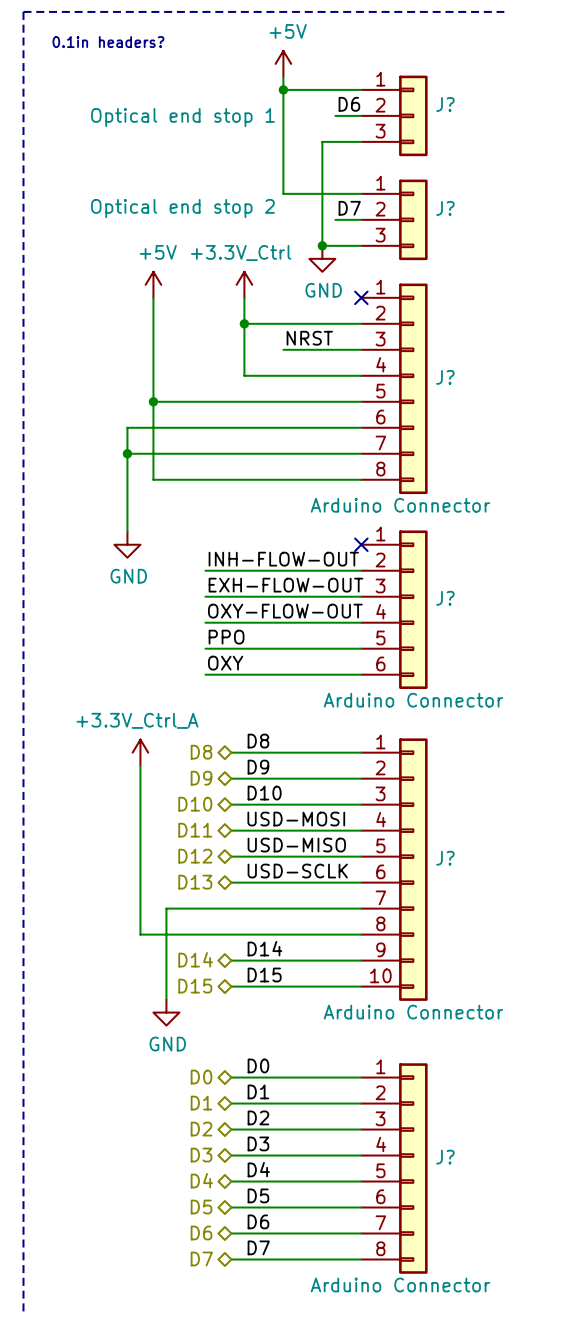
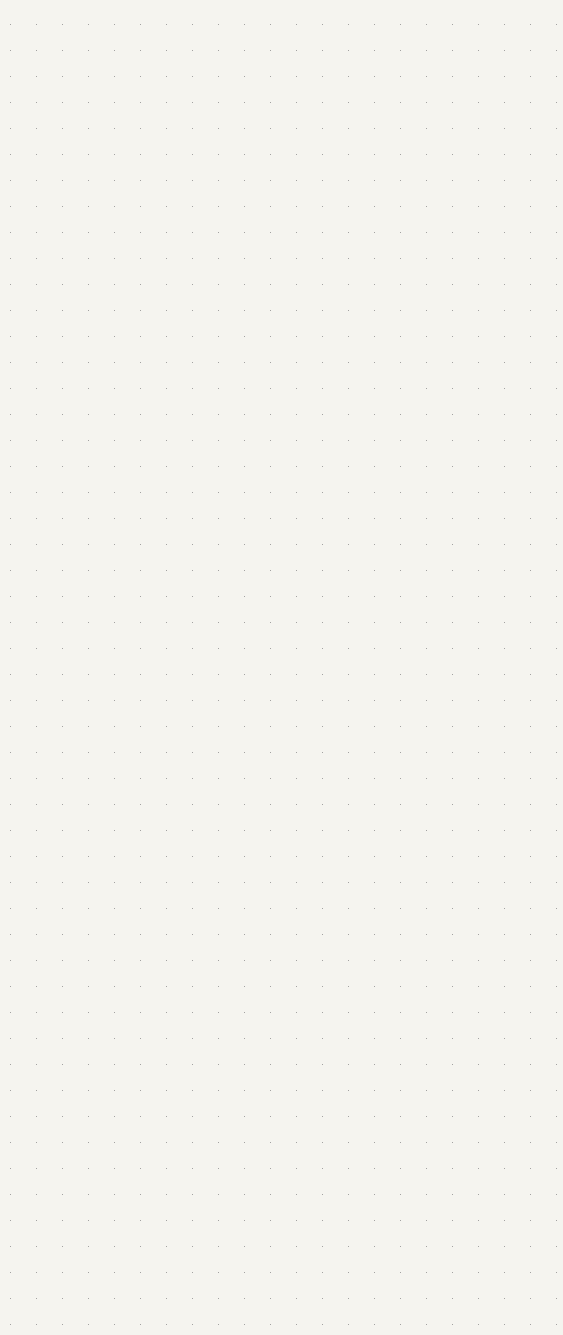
line: (504, 11) (23, 11) (23, 1311) -> none
text: 0.1in headers? (108, 42) -> none
power symbol: +5V (283, 63) -> none
wire: (283, 76) (283, 193) (361, 193) -> none
wire: (283, 89) (361, 89) -> none
junction: (283, 89) -> none
label: D6 (349, 104) -> none
wire: (335, 115) (361, 115) -> none
J?: Optical end stop 1 (394, 115) -> none
wire: (361, 141) (322, 141) (322, 245) (361, 245) -> none
label: D7 (349, 208) -> none
wire: (335, 219) (361, 219) -> none
J?: Optical end stop 2 (394, 219) -> none
junction: (322, 245) -> none
power symbol: GND (322, 258) -> none
power symbol: +5V (153, 284) -> none
power symbol: +3.3V_Ctrl (244, 284) -> none
wire: (153, 297) (153, 479) (361, 479) -> none
wire: (244, 297) (244, 375) (361, 375) -> none
no-connect mark: (361, 297) -> none
wire: (244, 323) (361, 323) -> none
junction: (244, 323) -> none
label: NRST (309, 338) -> none
wire: (283, 349) (361, 349) -> none
J?: Arduino Connector (394, 388) -> none
wire: (153, 401) (361, 401) -> none
junction: (153, 401) -> none
wire: (361, 427) (127, 427) (127, 531) -> none
wire: (127, 453) (361, 453) -> none
junction: (127, 453) -> none
power symbol: GND (127, 544) -> none
no-connect mark: (361, 544) -> none
label: INH-FLOW-OUT (283, 559) -> none
wire: (205, 570) (361, 570) -> none
label: EXH-FLOW-OUT (285, 585) -> none
wire: (205, 596) (361, 596) -> none
J?: Arduino Connector (394, 609) -> none
label: OXY-FLOW-OUT (285, 611) -> none
wire: (205, 622) (361, 622) -> none
label: PPO (226, 637) -> none
wire: (205, 648) (361, 648) -> none
label: OXY (225, 663) -> none
wire: (205, 674) (361, 674) -> none
label: D8 (258, 741) -> none
power symbol: +3.3V_Ctrl_A (140, 752) -> none
hierarchical label: D8 (201, 752) -> none
wire: (231, 752) (361, 752) -> none
wire: (140, 765) (140, 934) (361, 934) -> none
label: D9 (258, 767) -> none
hierarchical label: D9 (201, 778) -> none
wire: (231, 778) (361, 778) -> none
label: D10 (264, 793) -> none
hierarchical label: D10 (195, 804) -> none
wire: (231, 804) (361, 804) -> none
label: USD-MOSI (296, 819) -> none
hierarchical label: D11 (195, 830) -> none
wire: (231, 830) (361, 830) -> none
label: USD-MISO (296, 845) -> none
hierarchical label: D12 (195, 856) -> none
wire: (231, 856) (361, 856) -> none
J?: Arduino Connector (394, 869) -> none
label: USD-SCLK (297, 871) -> none
hierarchical label: D13 (195, 882) -> none
wire: (231, 882) (361, 882) -> none
wire: (361, 908) (166, 908) (166, 999) -> none
label: D14 (264, 948) -> none
hierarchical label: D14 (195, 959) -> none
wire: (231, 960) (361, 960) -> none
label: D15 (264, 974) -> none
hierarchical label: D15 (195, 986) -> none
wire: (231, 986) (361, 986) -> none
power symbol: GND (166, 1012) -> none
label: D0 (258, 1065) -> none
hierarchical label: D0 (201, 1077) -> none
wire: (231, 1077) (361, 1077) -> none
label: D1 (258, 1091) -> none
hierarchical label: D1 (201, 1103) -> none
wire: (231, 1103) (361, 1103) -> none
label: D2 (258, 1117) -> none
hierarchical label: D2 (201, 1129) -> none
wire: (231, 1129) (361, 1129) -> none
label: D3 (258, 1143) -> none
hierarchical label: D3 (201, 1155) -> none
wire: (231, 1155) (361, 1155) -> none
J?: Arduino Connector (394, 1168) -> none
label: D4 (258, 1169) -> none
hierarchical label: D4 (201, 1180) -> none
wire: (231, 1181) (361, 1181) -> none
label: D5 (258, 1195) -> none
hierarchical label: D5 (201, 1207) -> none
wire: (231, 1207) (361, 1207) -> none
label: D6 (258, 1221) -> none
hierarchical label: D6 (201, 1233) -> none
wire: (231, 1233) (361, 1233) -> none
label: D7 (258, 1247) -> none
hierarchical label: D7 (201, 1259) -> none
wire: (231, 1259) (361, 1259) -> none

